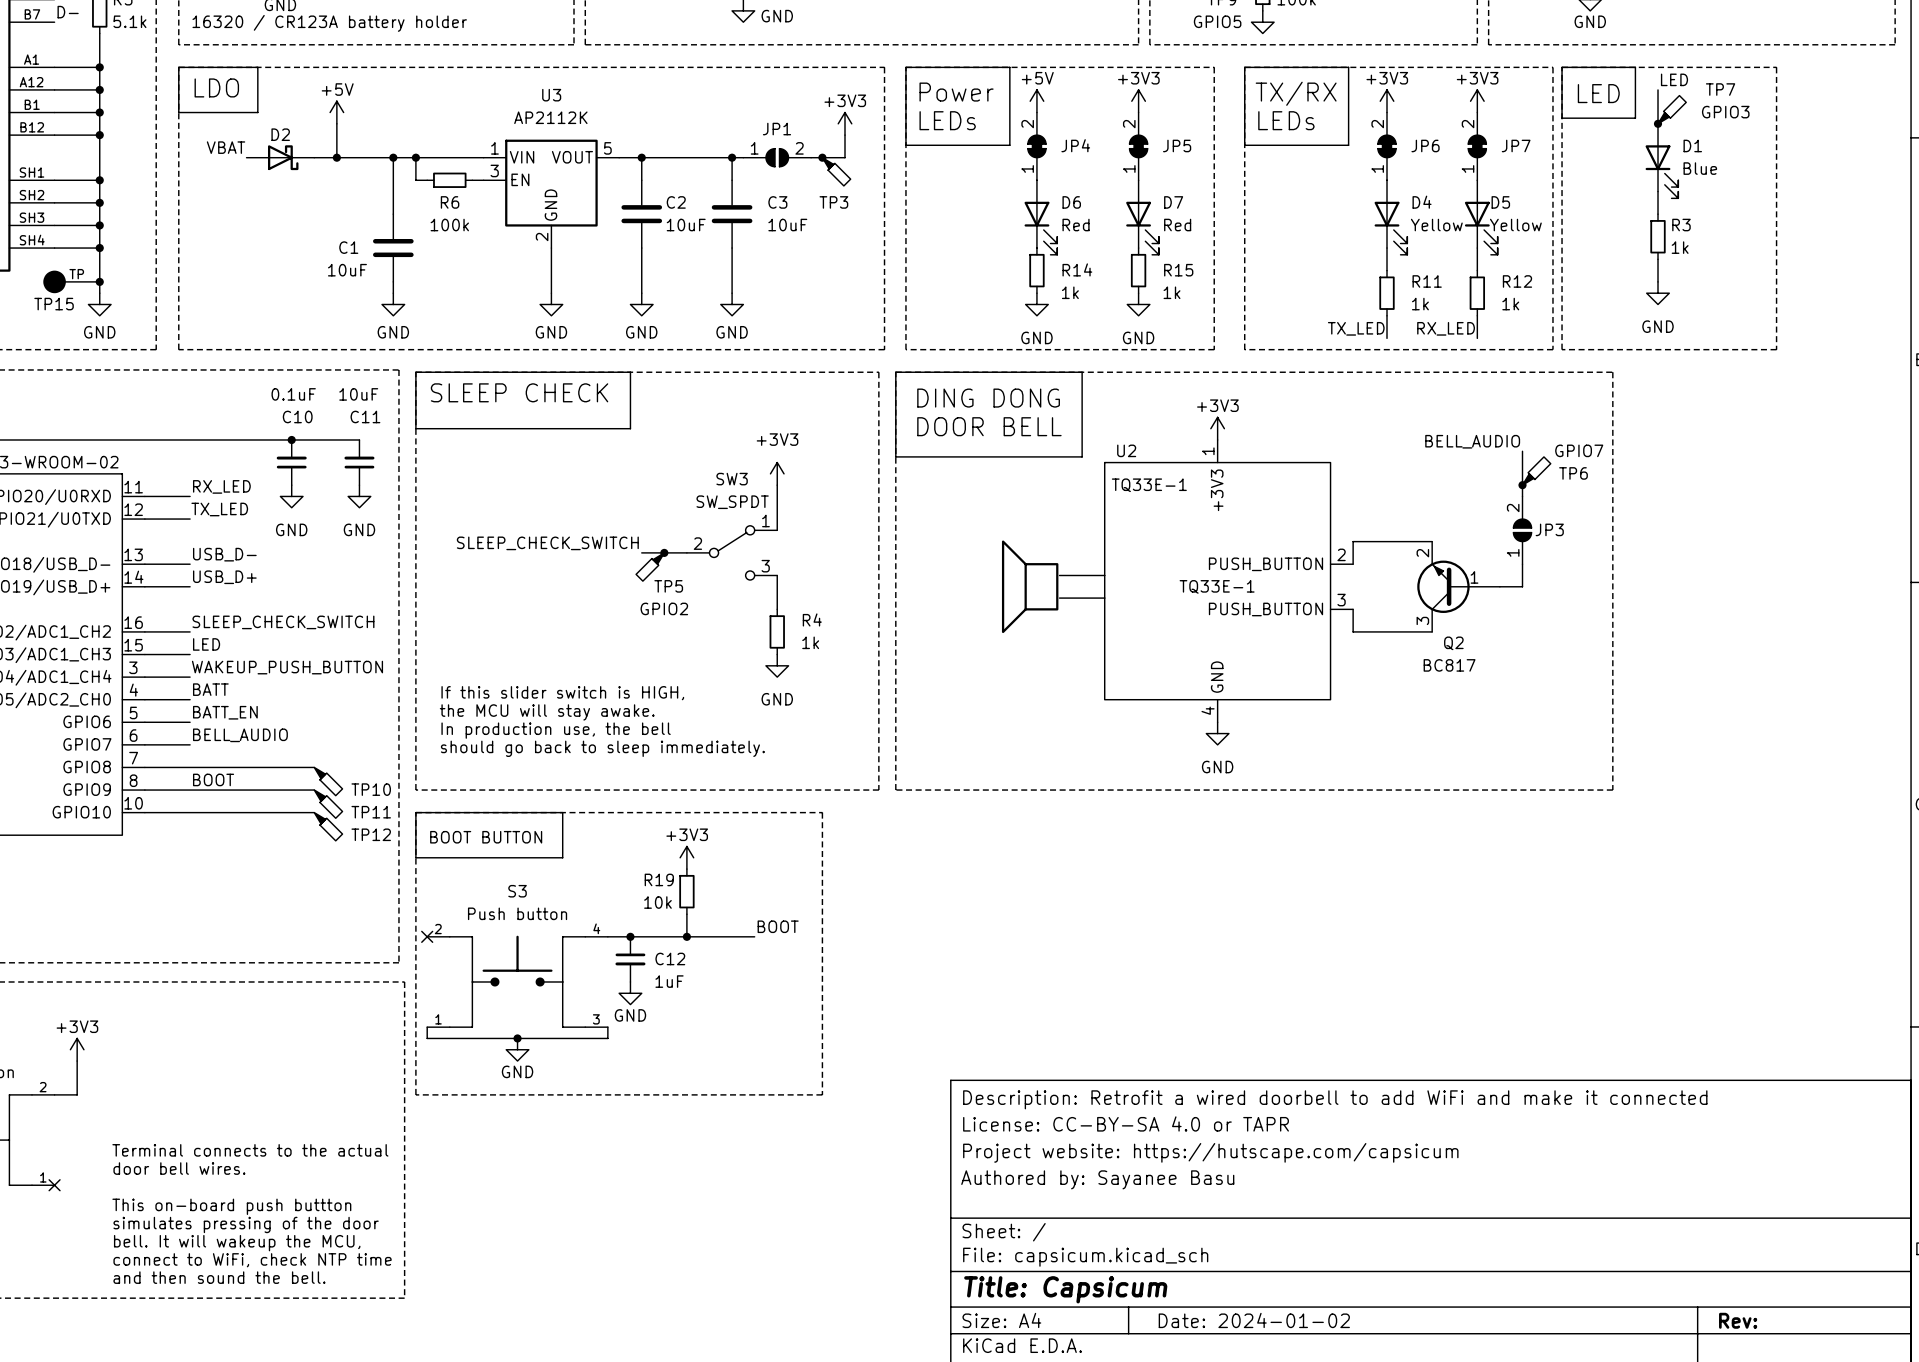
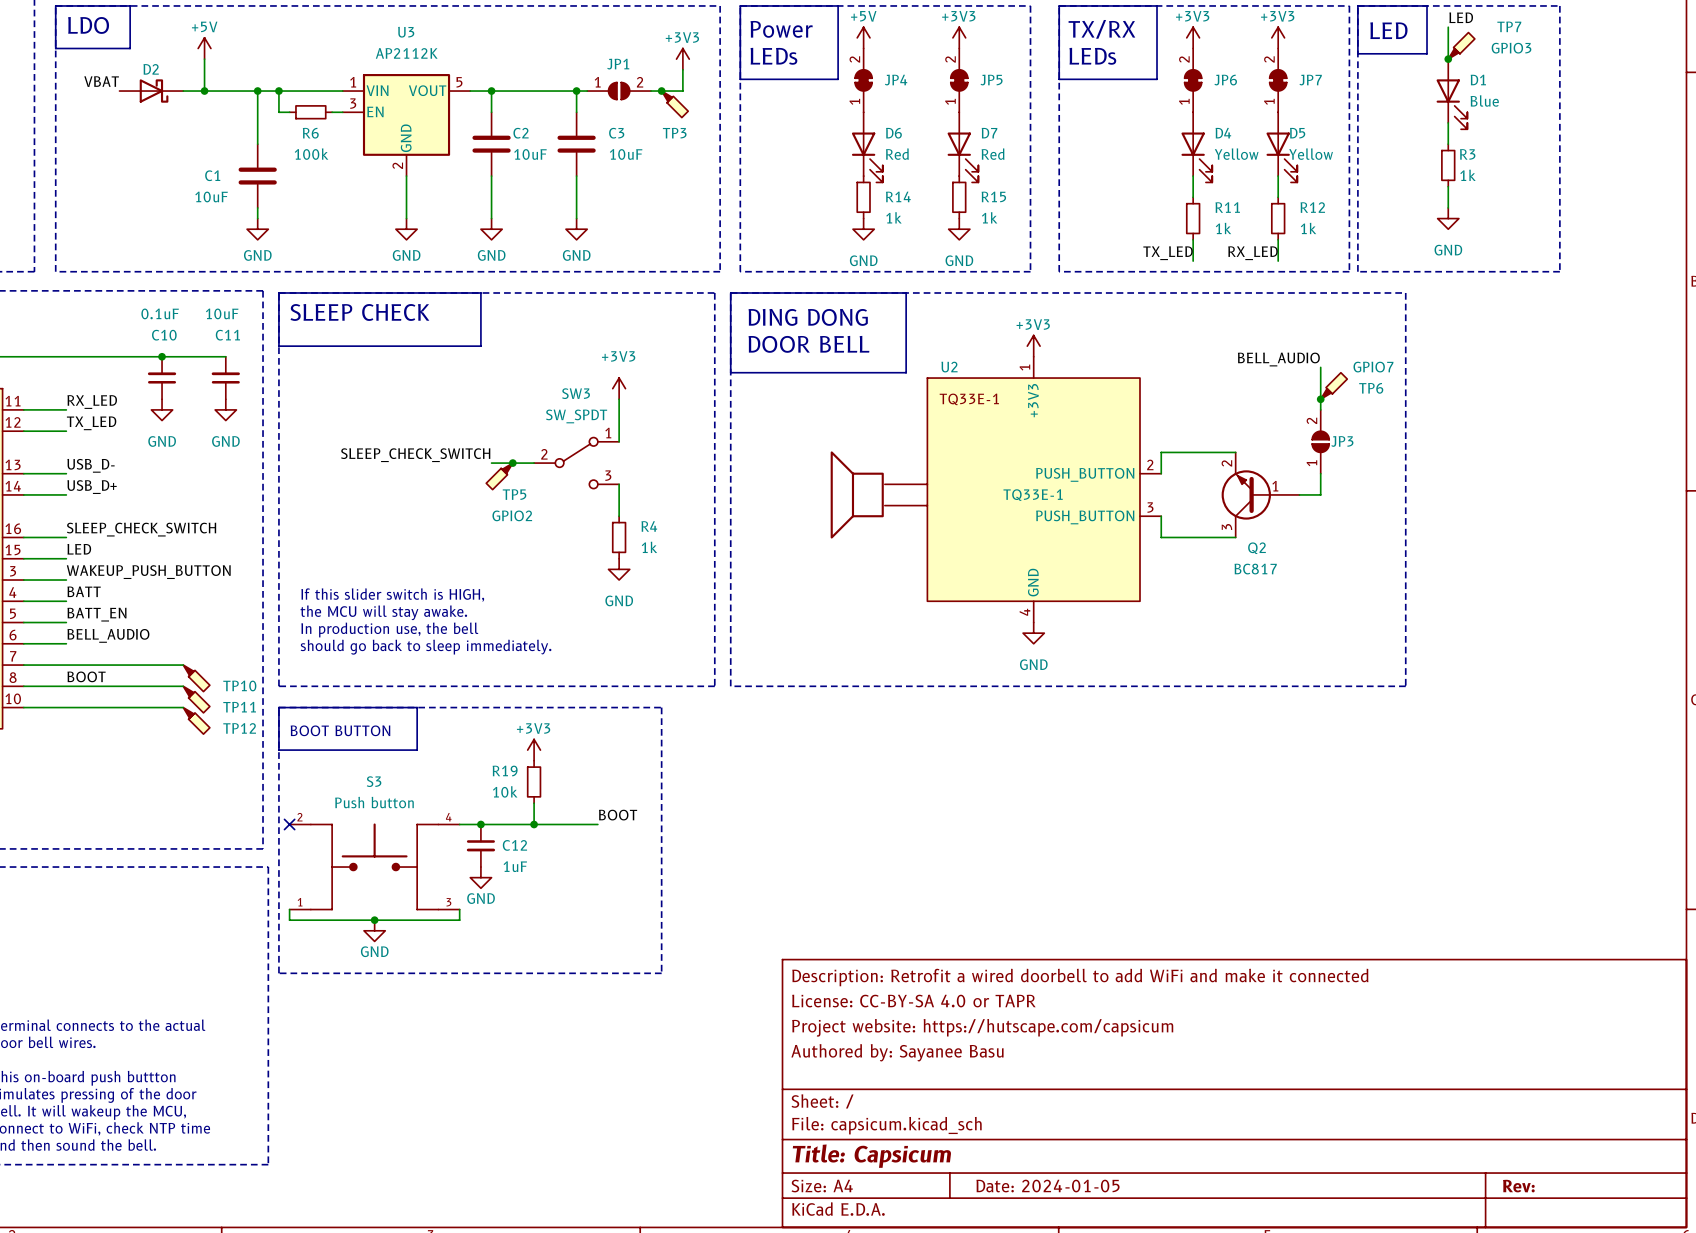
title block: Date: 2024-01-02 (1254, 1320) -> Date: 2024-01-05 (1047, 1186)

